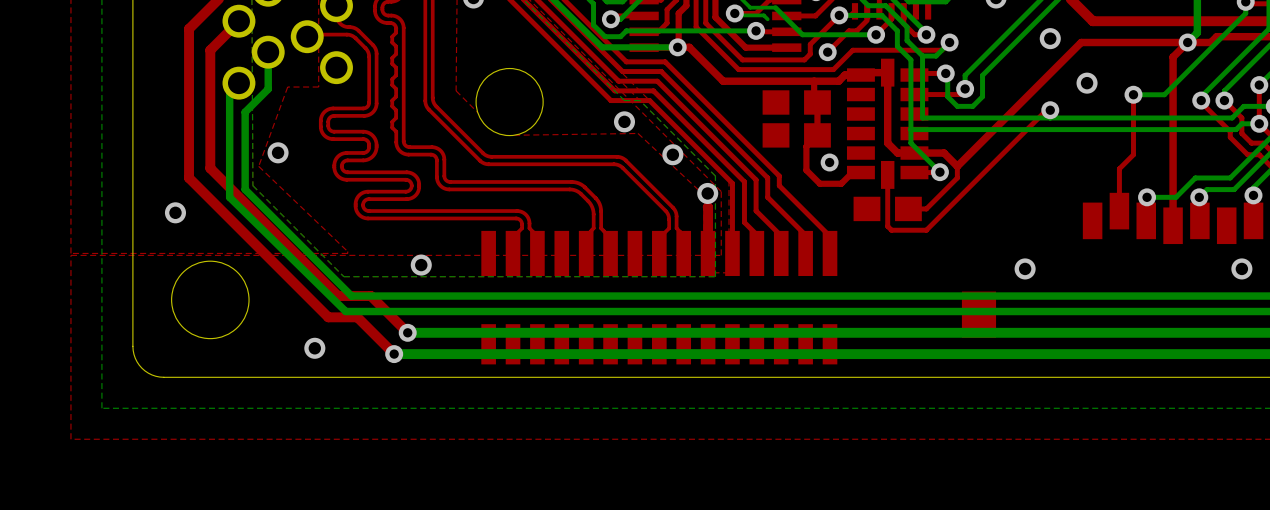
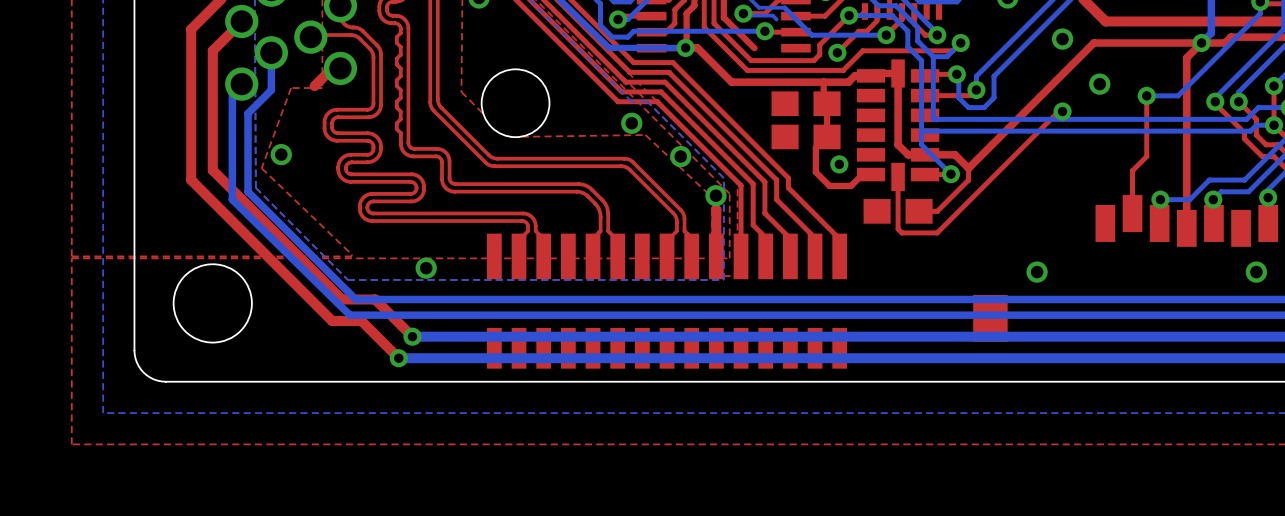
top track: (786, 47) (745, 47) -> none
top track: none -> (340, 68) (332, 68) (314, 86)
via: (175, 212) -> none
via: (314, 348) -> none

